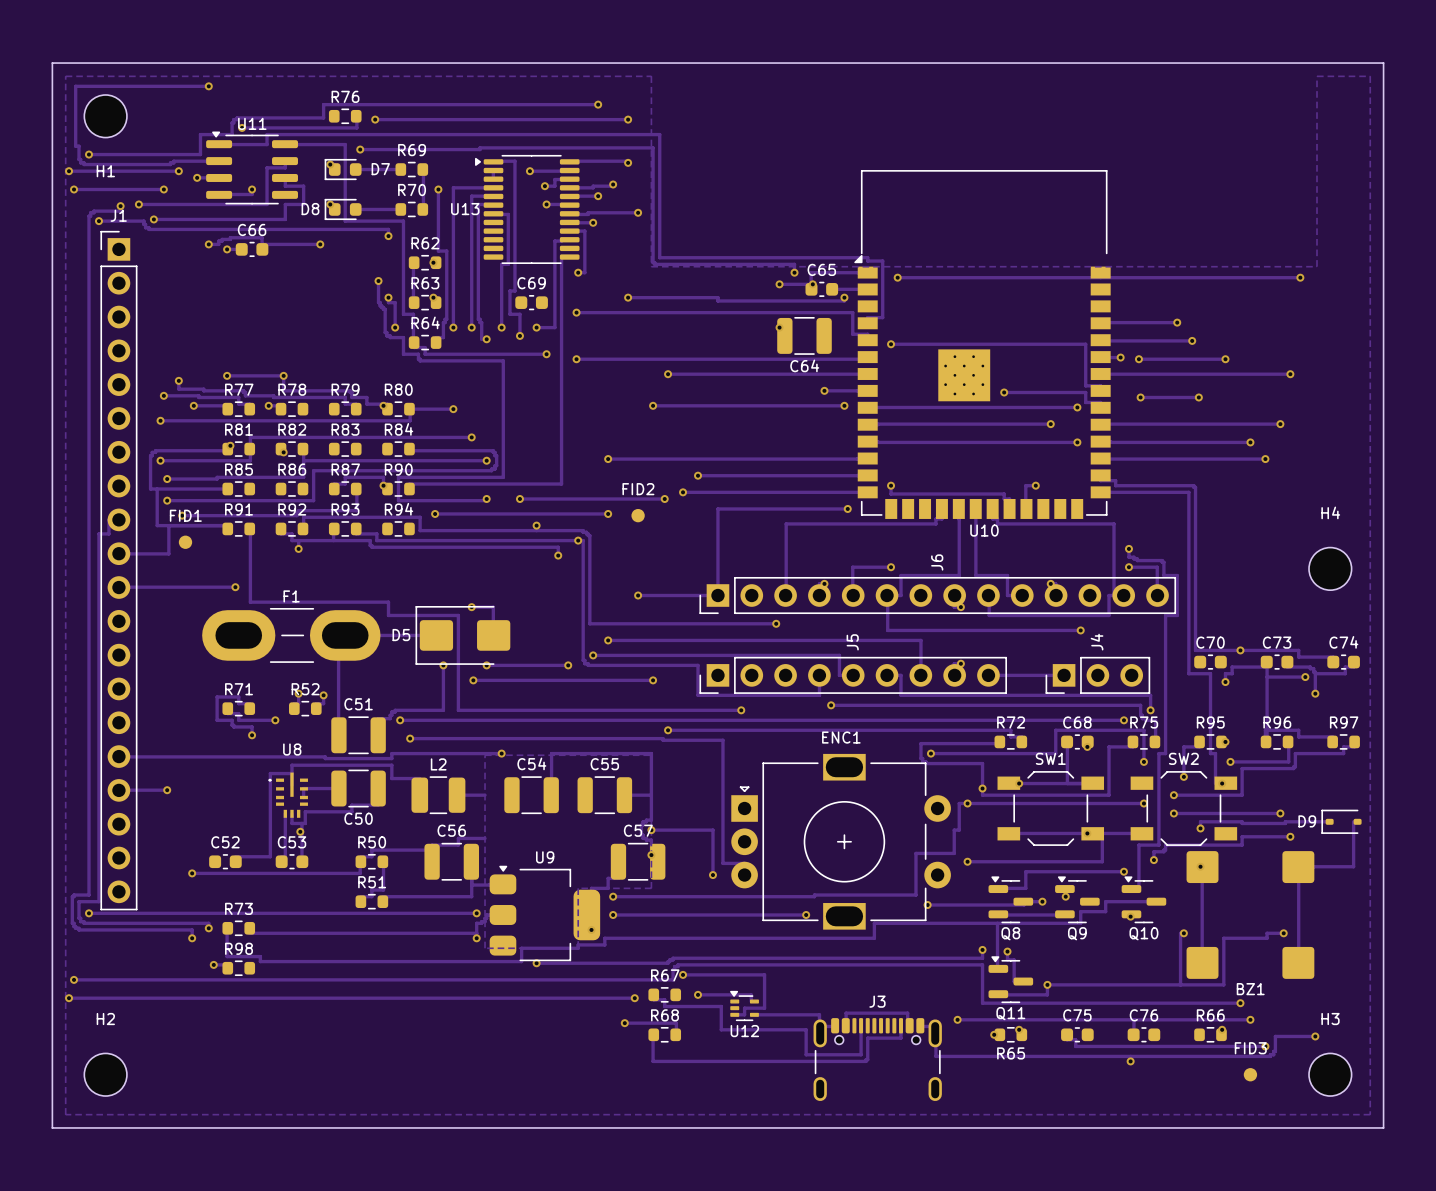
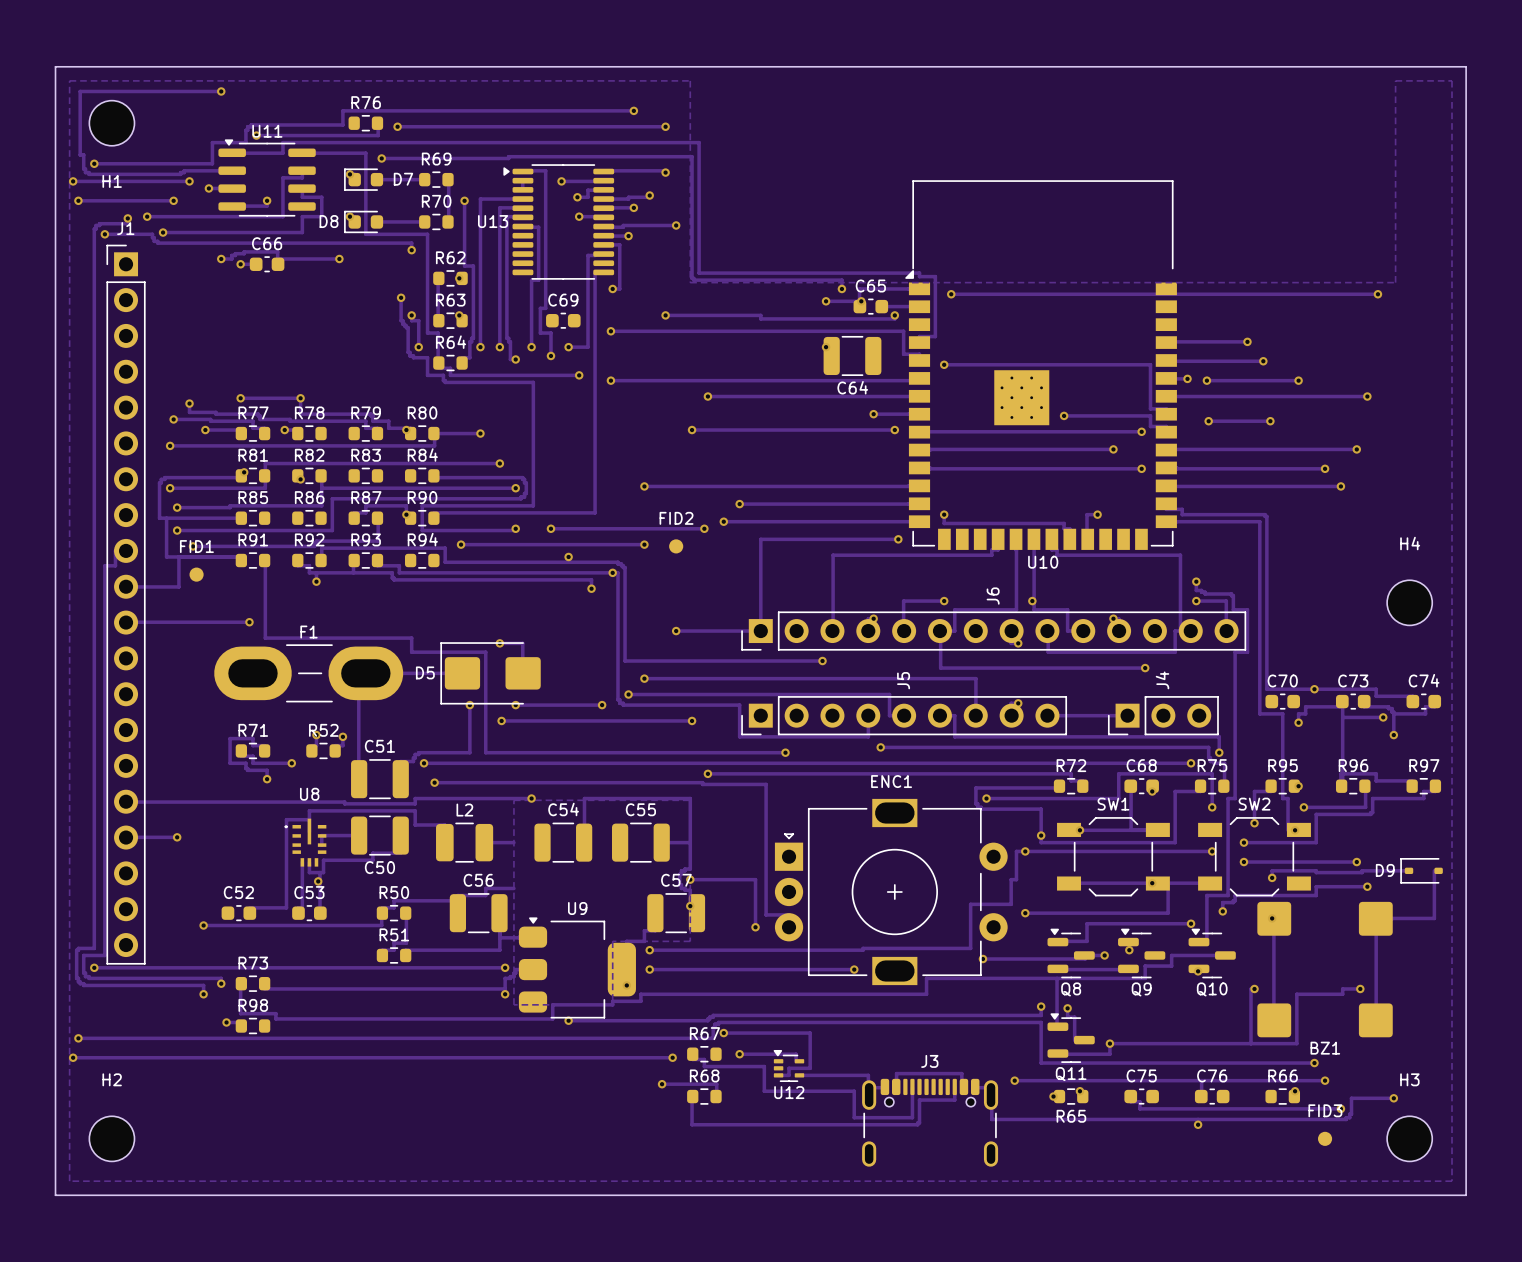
via: none -> (1032, 601)

